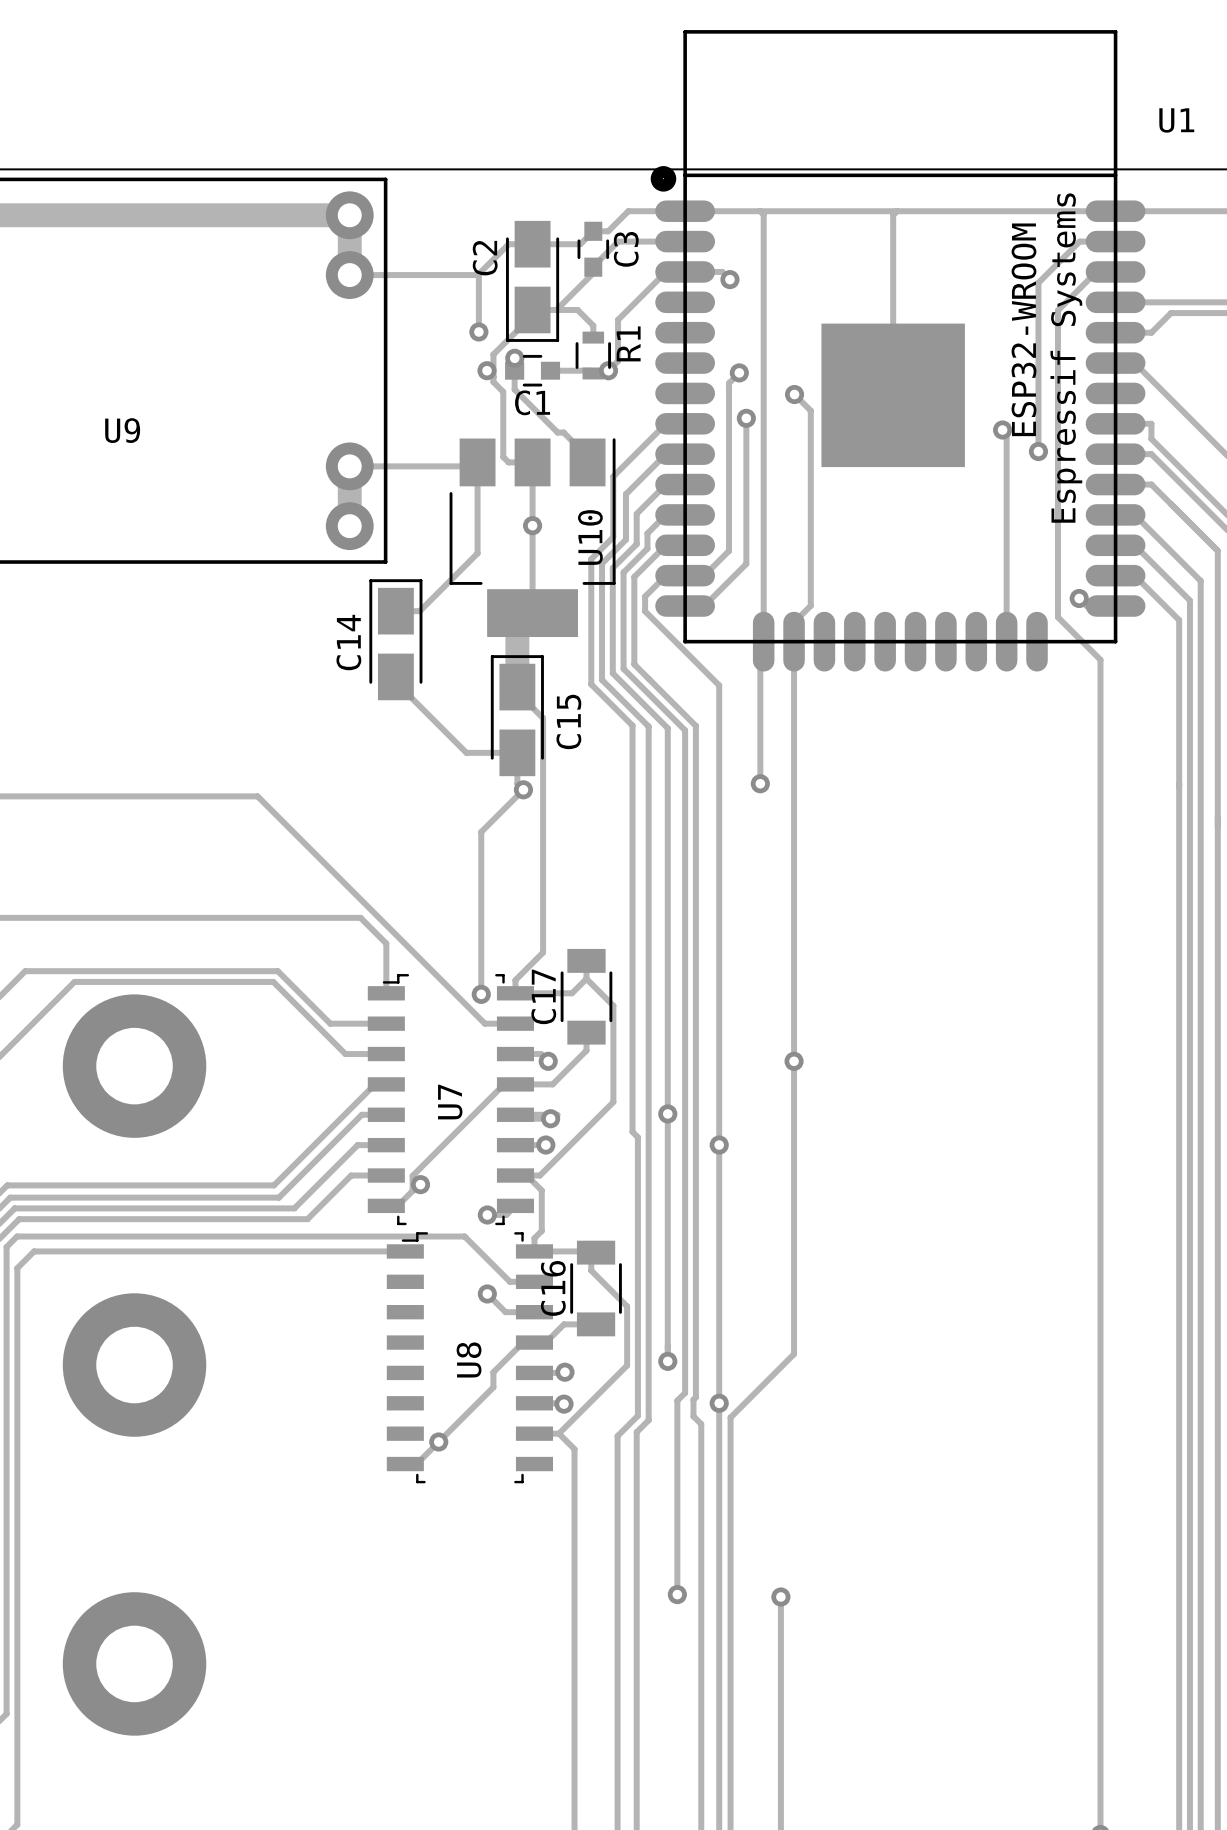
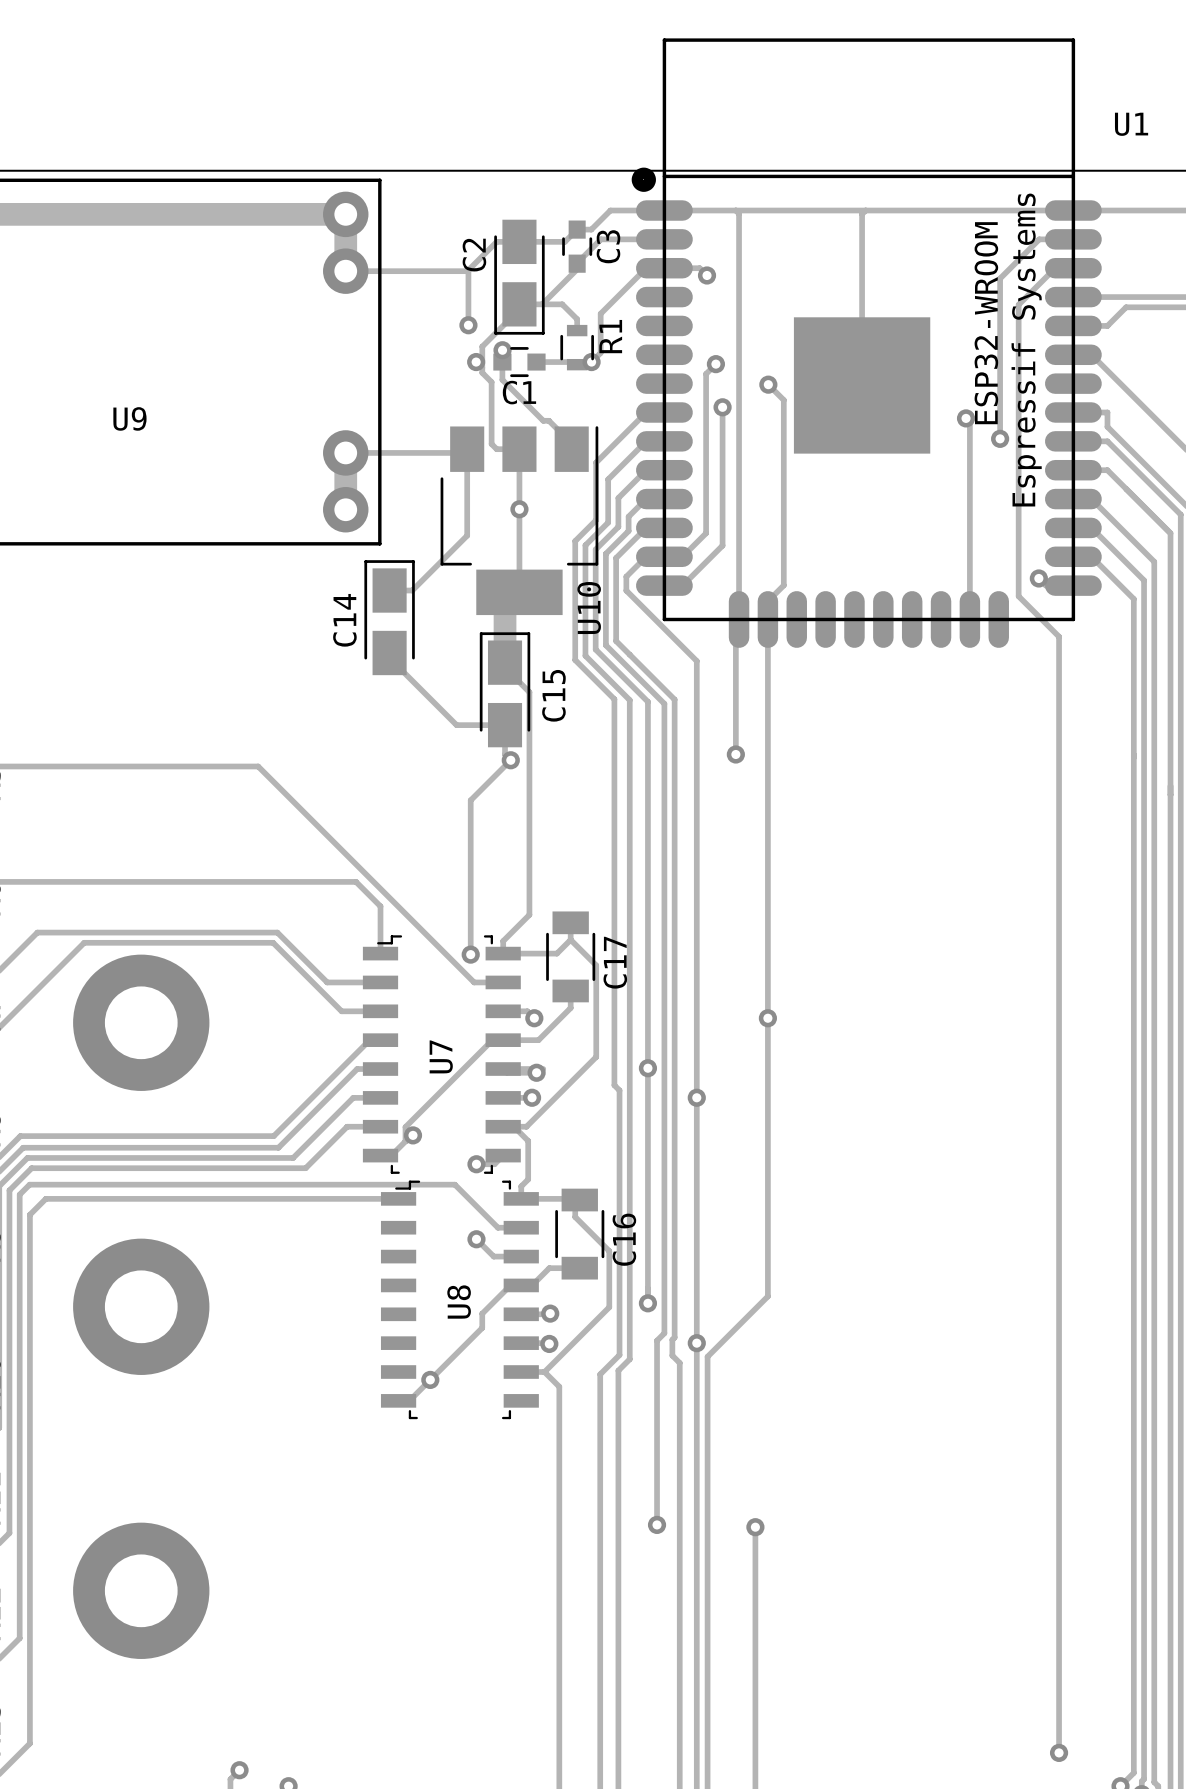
U10 name position: U10 (590, 537) -> U10 (589, 608)
C17 name position: C17 (543, 996) -> C17 (615, 962)
C16 name position: C16 (553, 1288) -> C16 (624, 1239)

